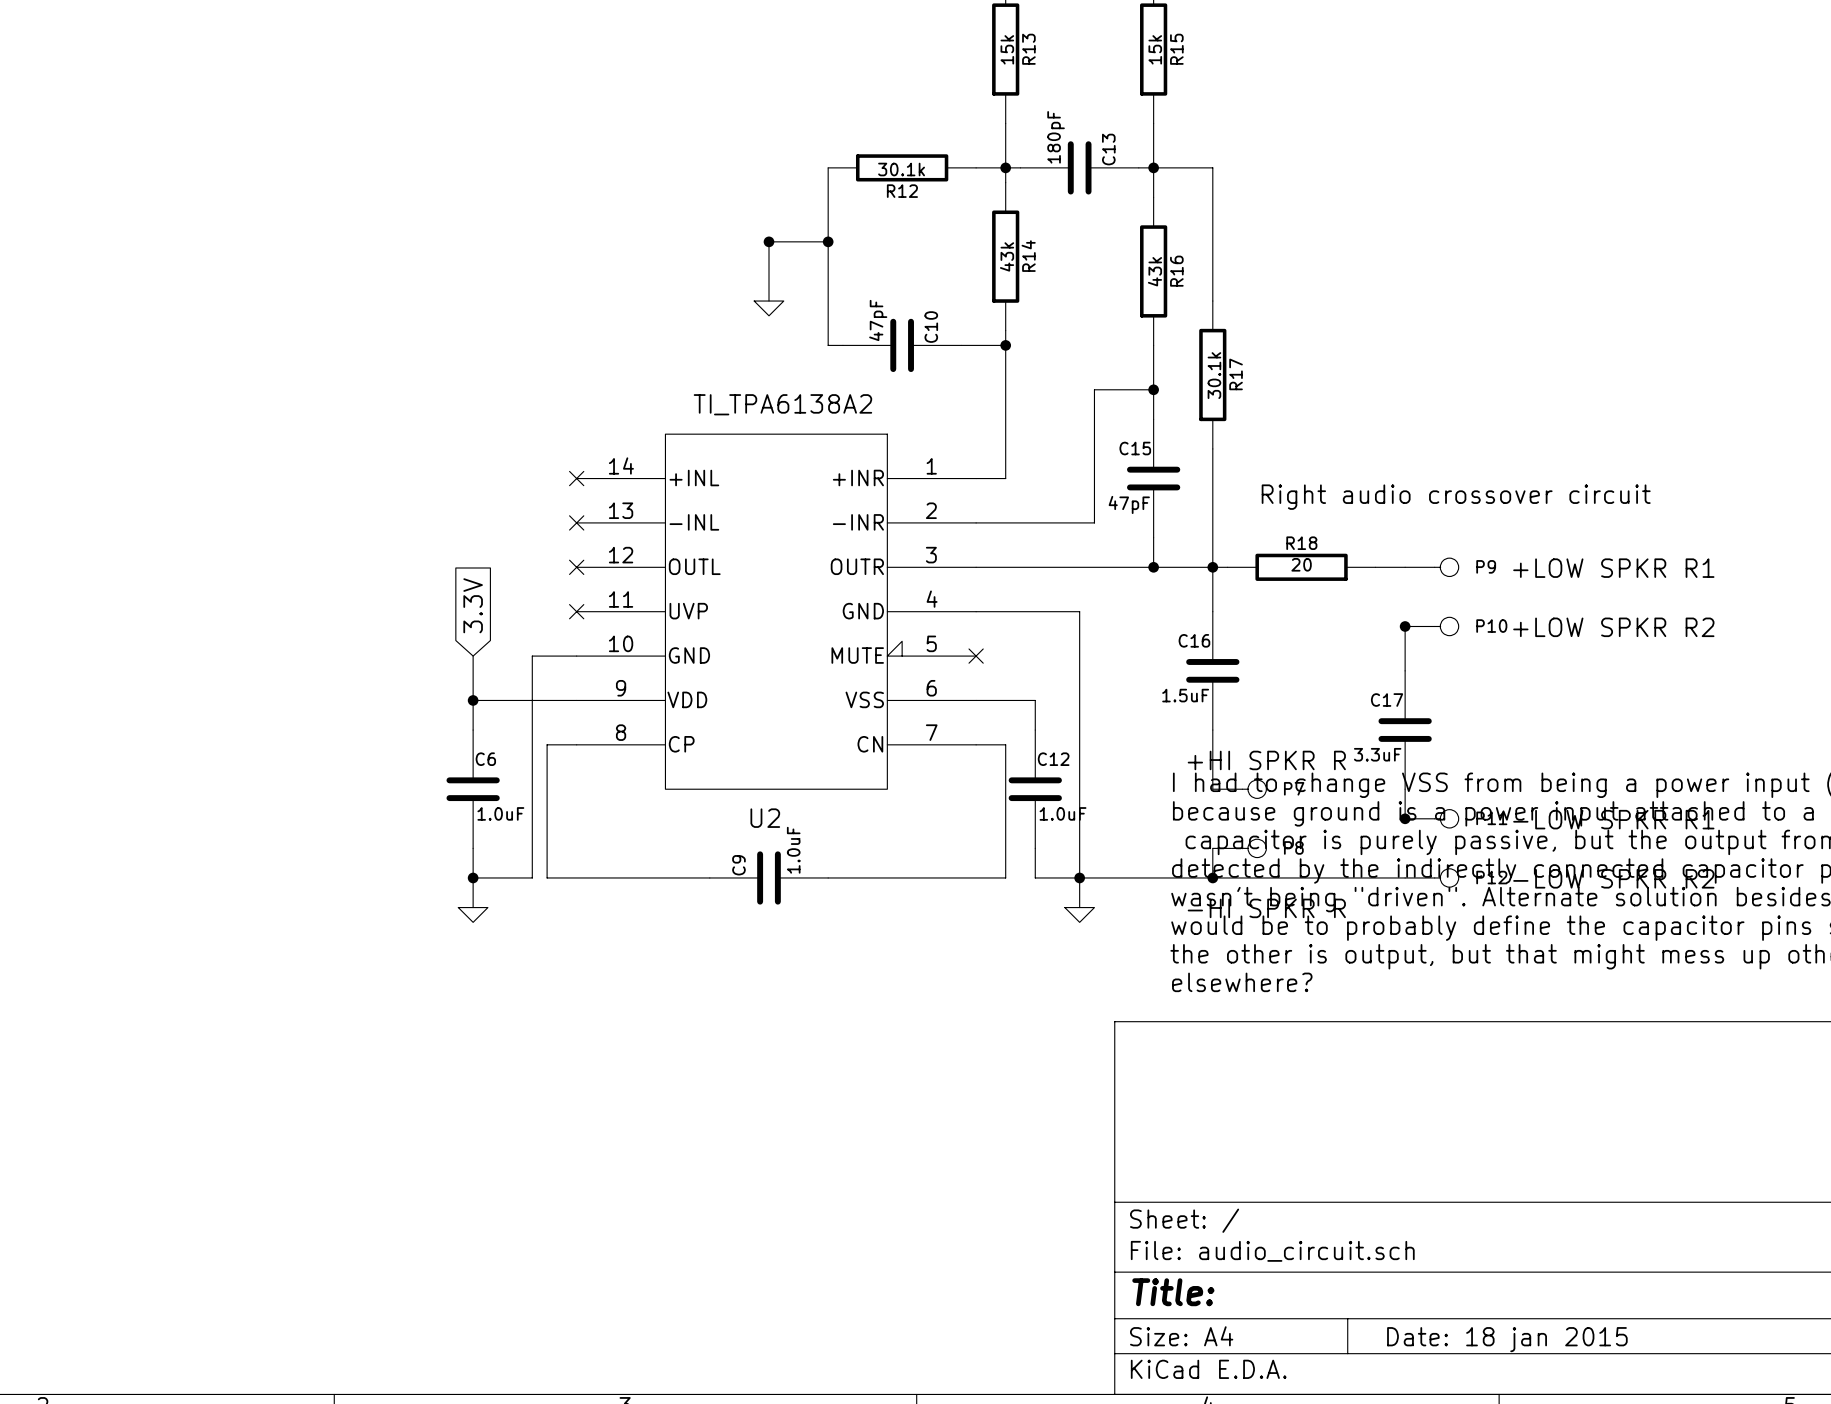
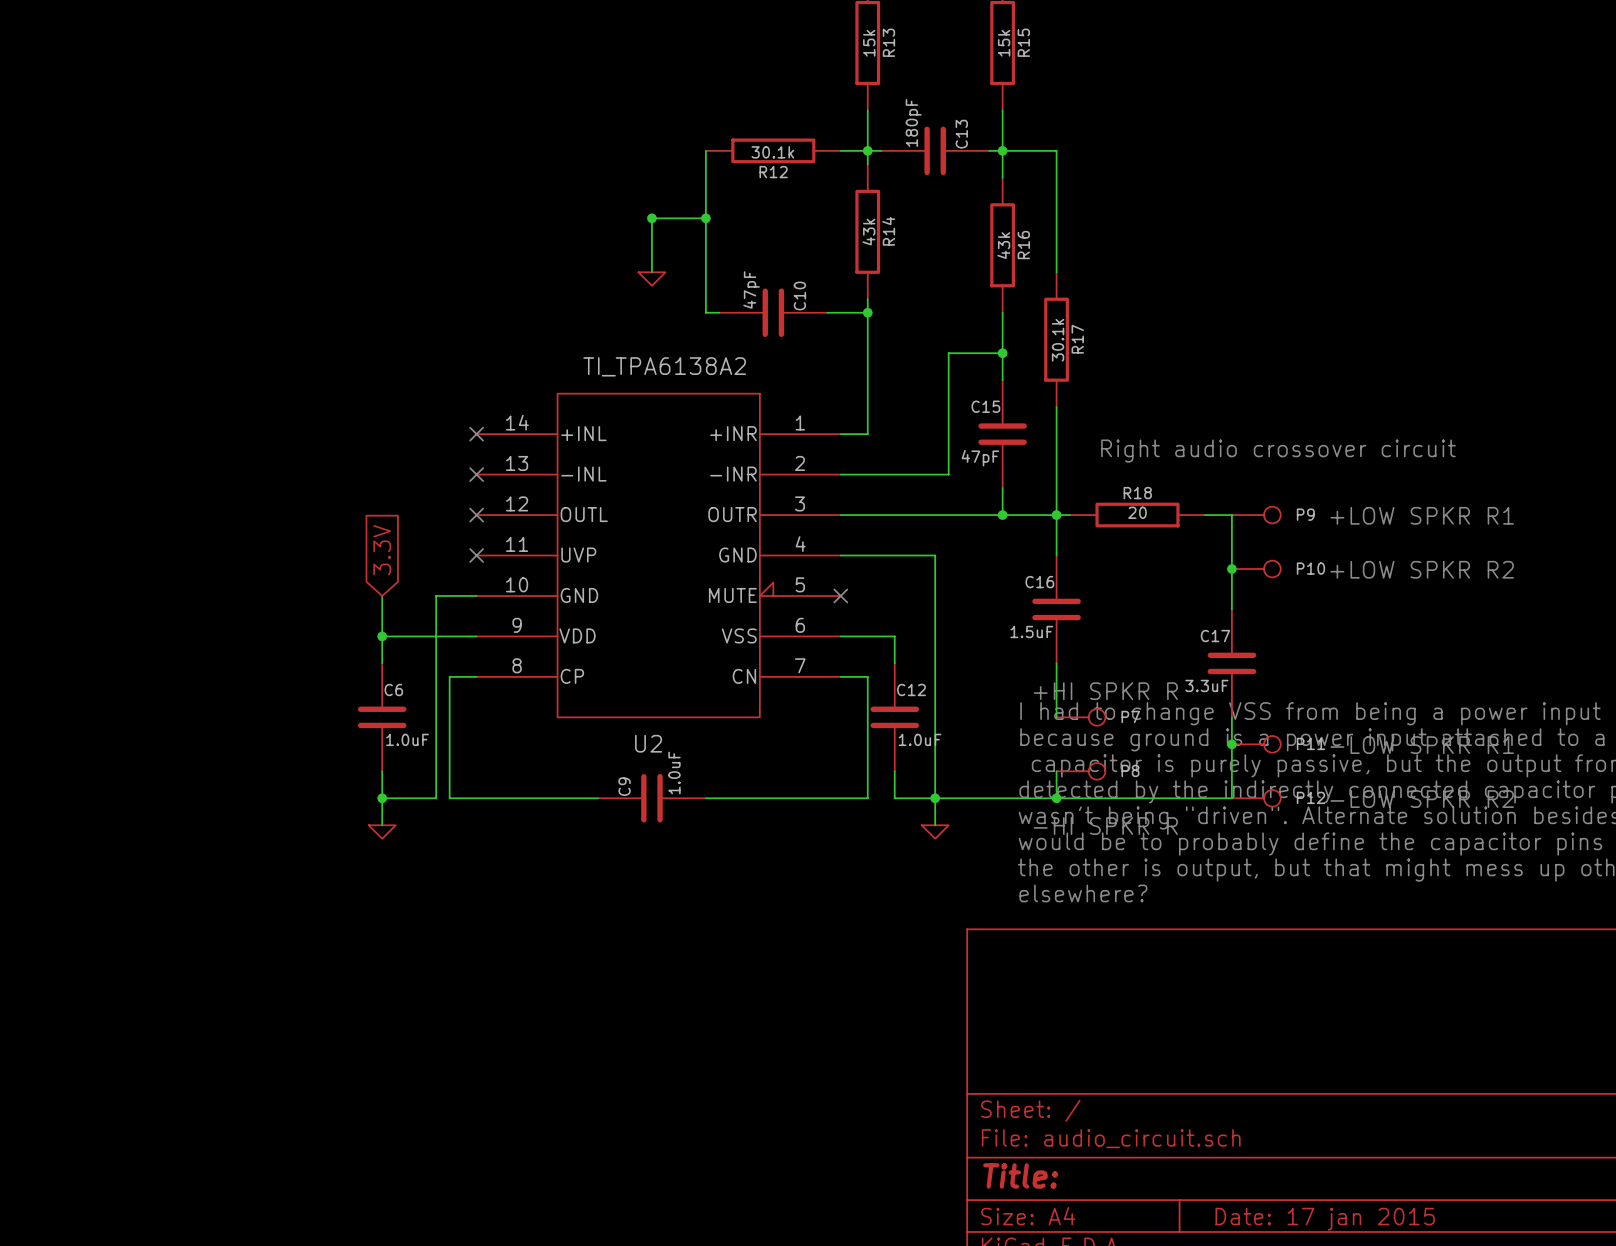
wire: none -> (1231, 515) (1231, 569)
wire: none -> (1231, 744) (1231, 798)
title block: Date: 18 jan 2015 (1507, 1339) -> Date: 17 jan 2015 (1325, 1219)

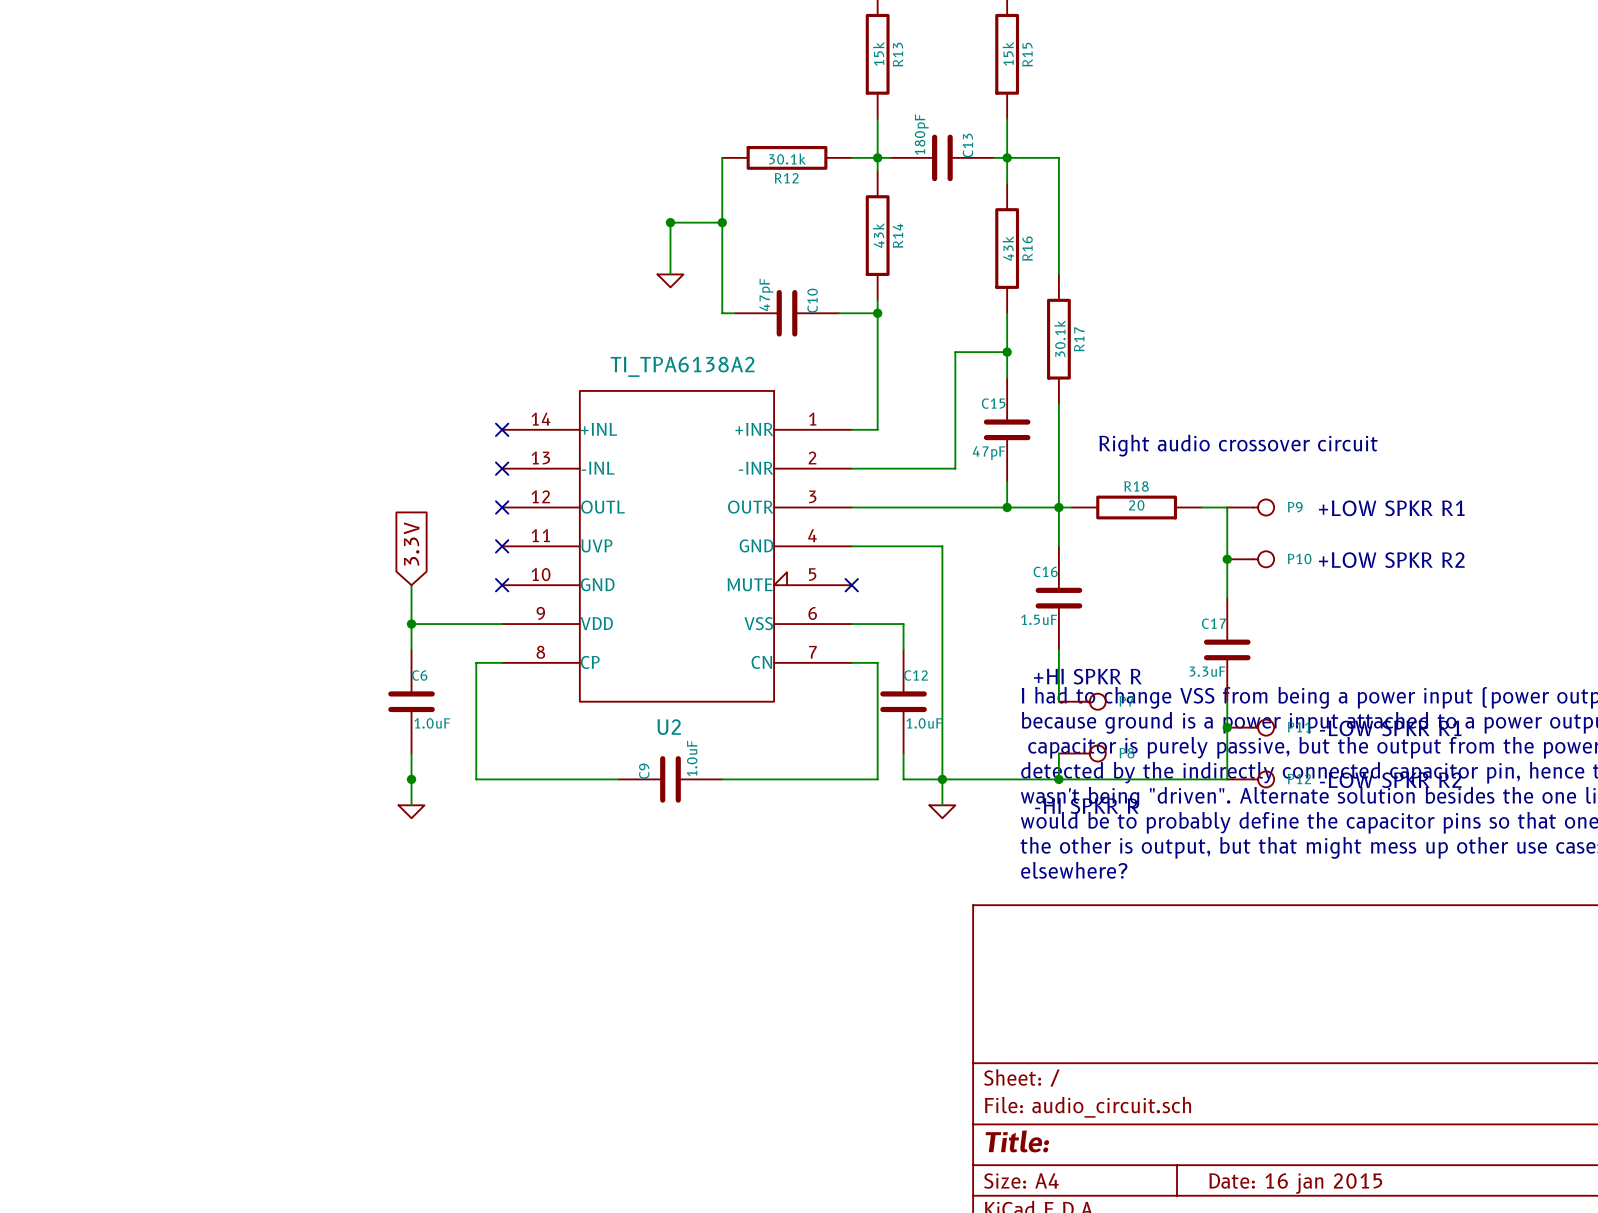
wire: (476, 595) (436, 595) (436, 798) (382, 798) -> none
no-connect mark: none -> (502, 585)
title block: Date: 17 jan 2015 (1325, 1219) -> Date: 16 jan 2015 (1295, 1183)

